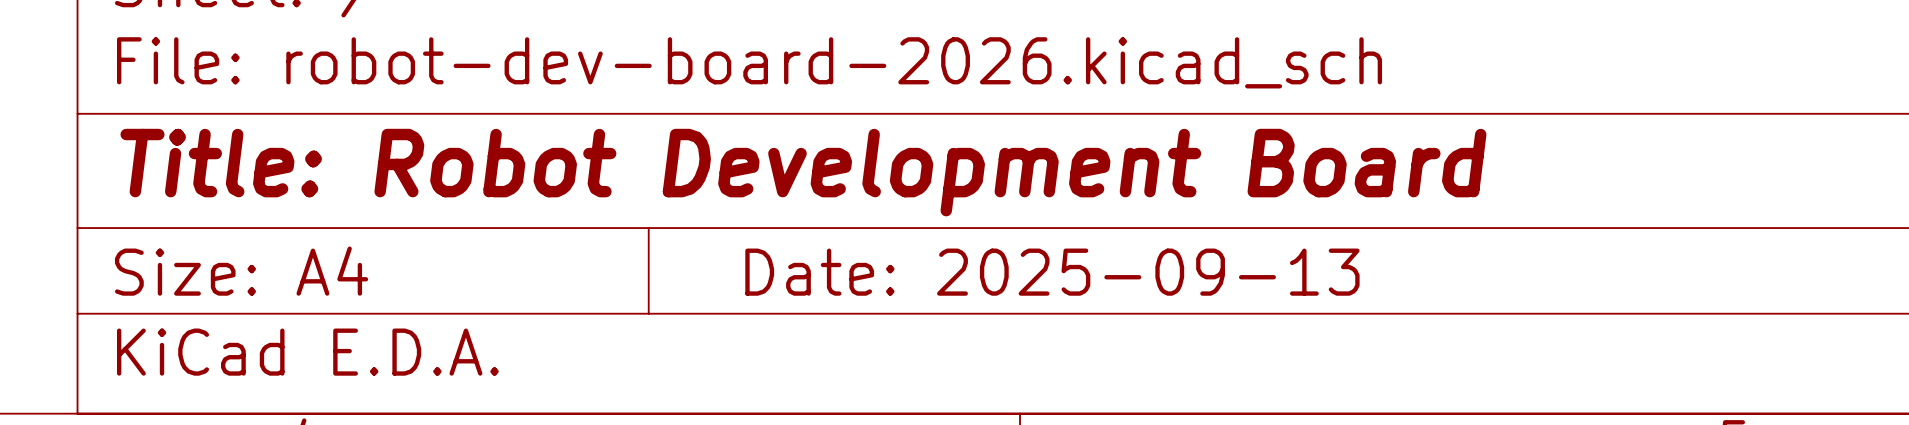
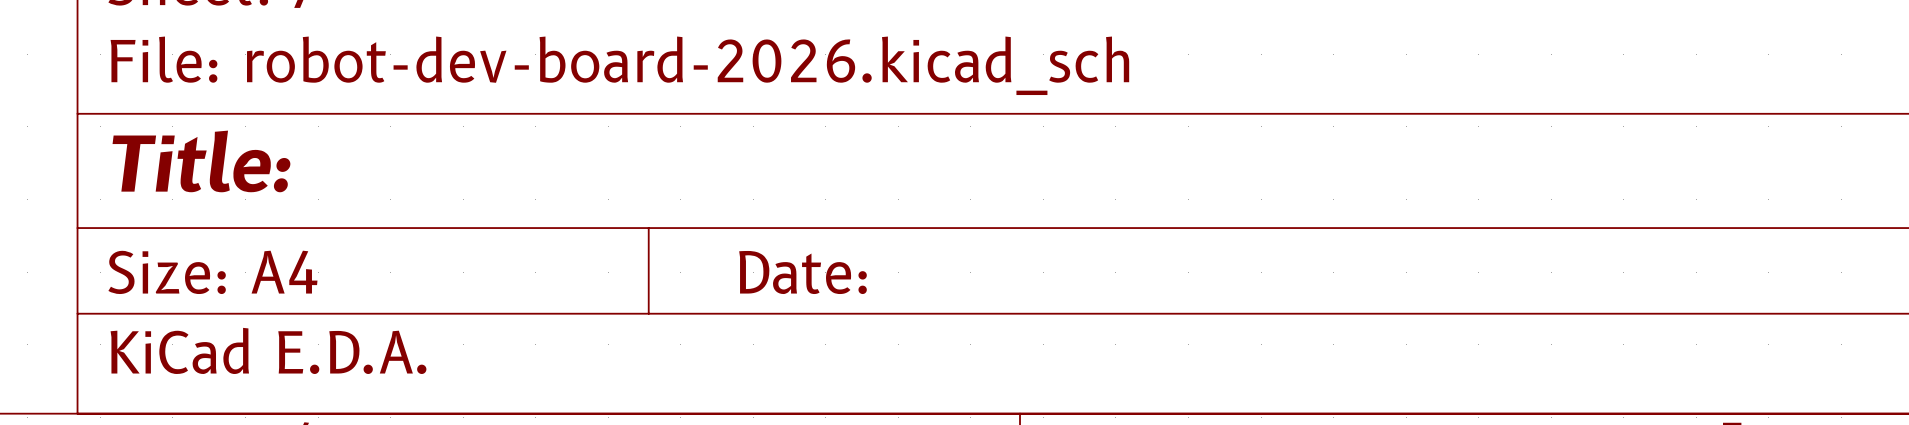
title block: Title: Robot Development Board (803, 172) -> Title: (201, 161)
title block: Date: 2025-09-13 (1052, 272) -> Date: (803, 272)

